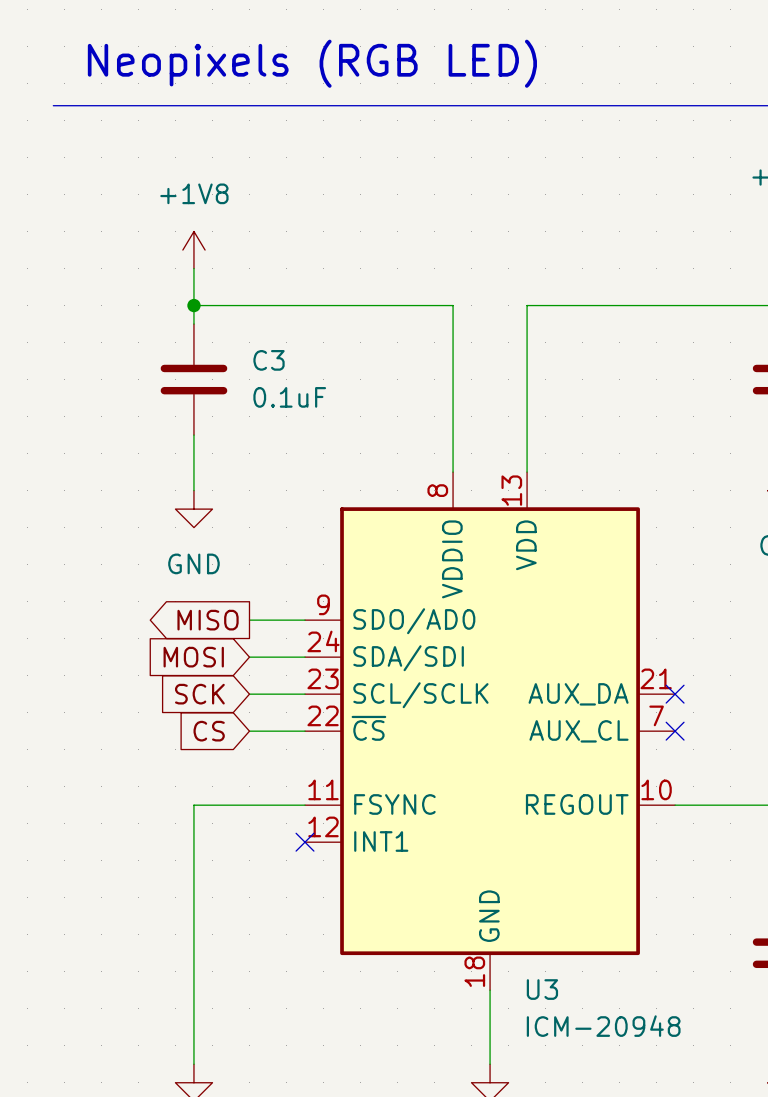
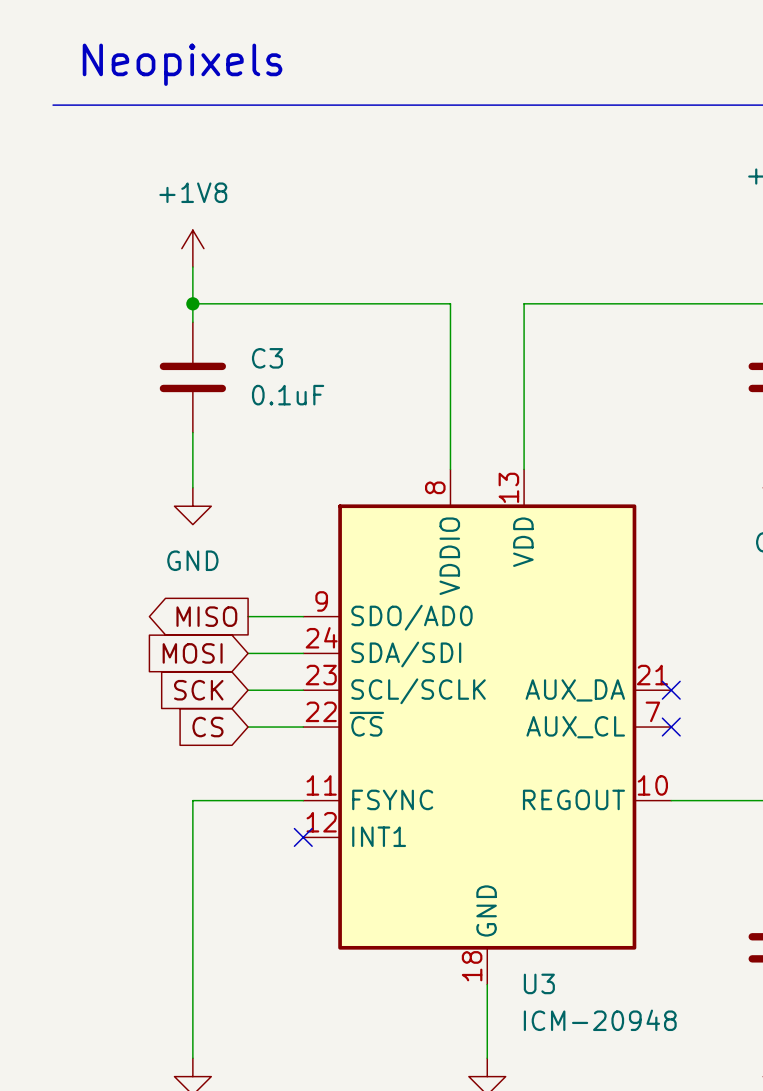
text: Neopixels (RGB LED) (312, 63) -> Neopixels (182, 64)

